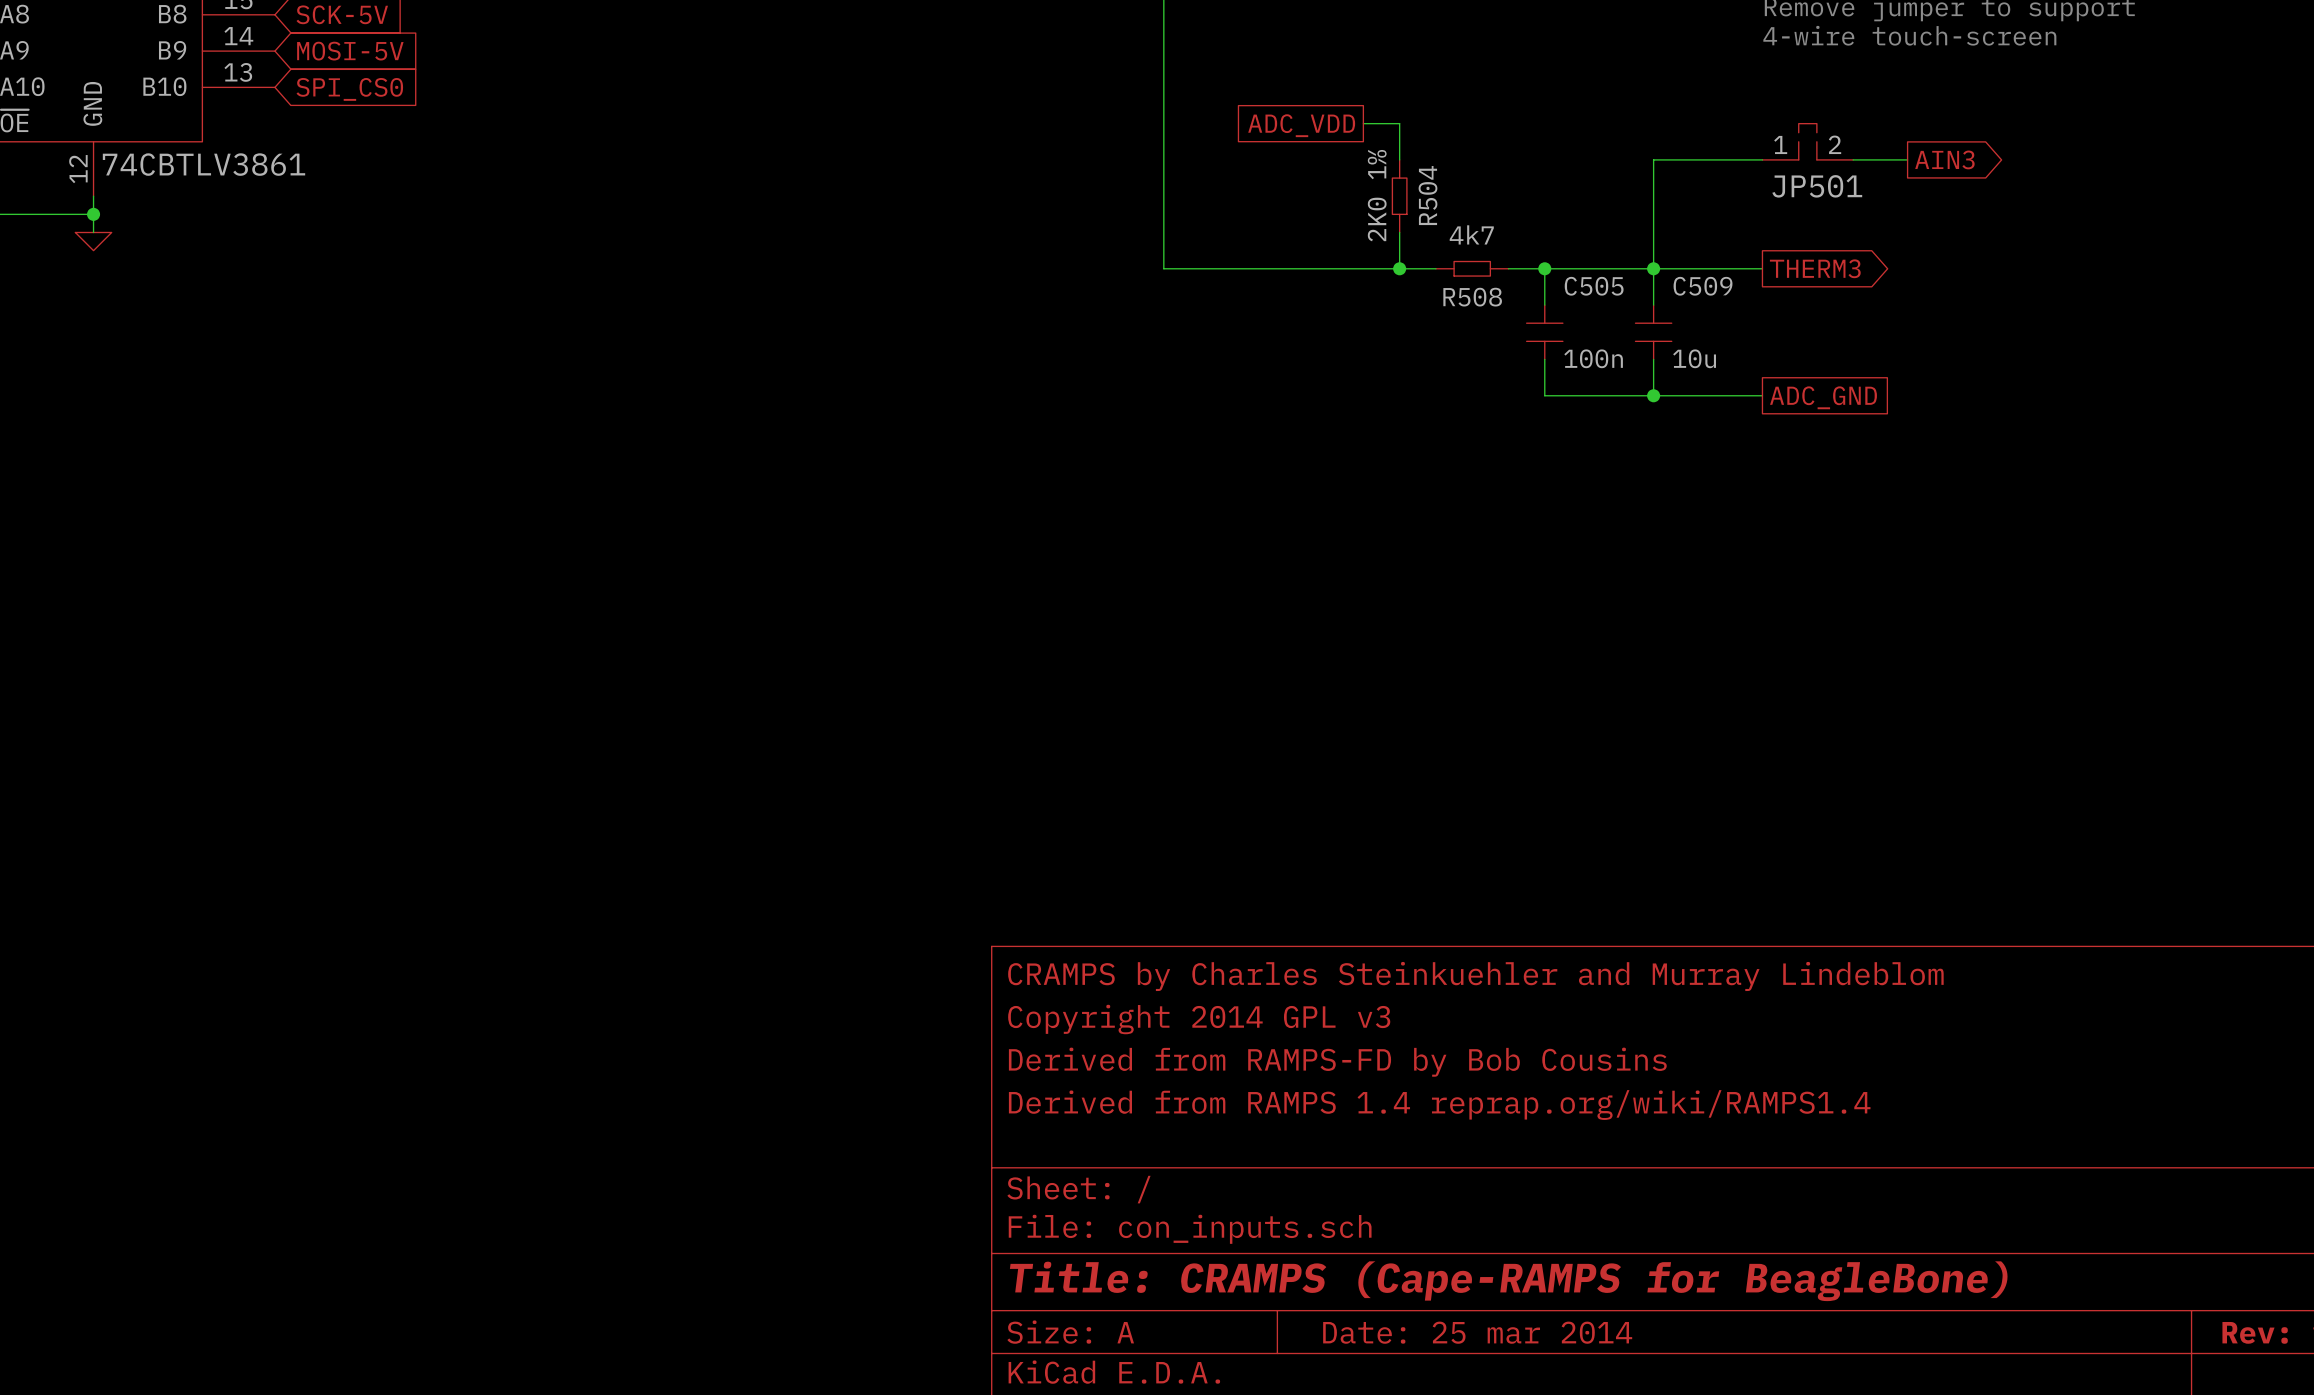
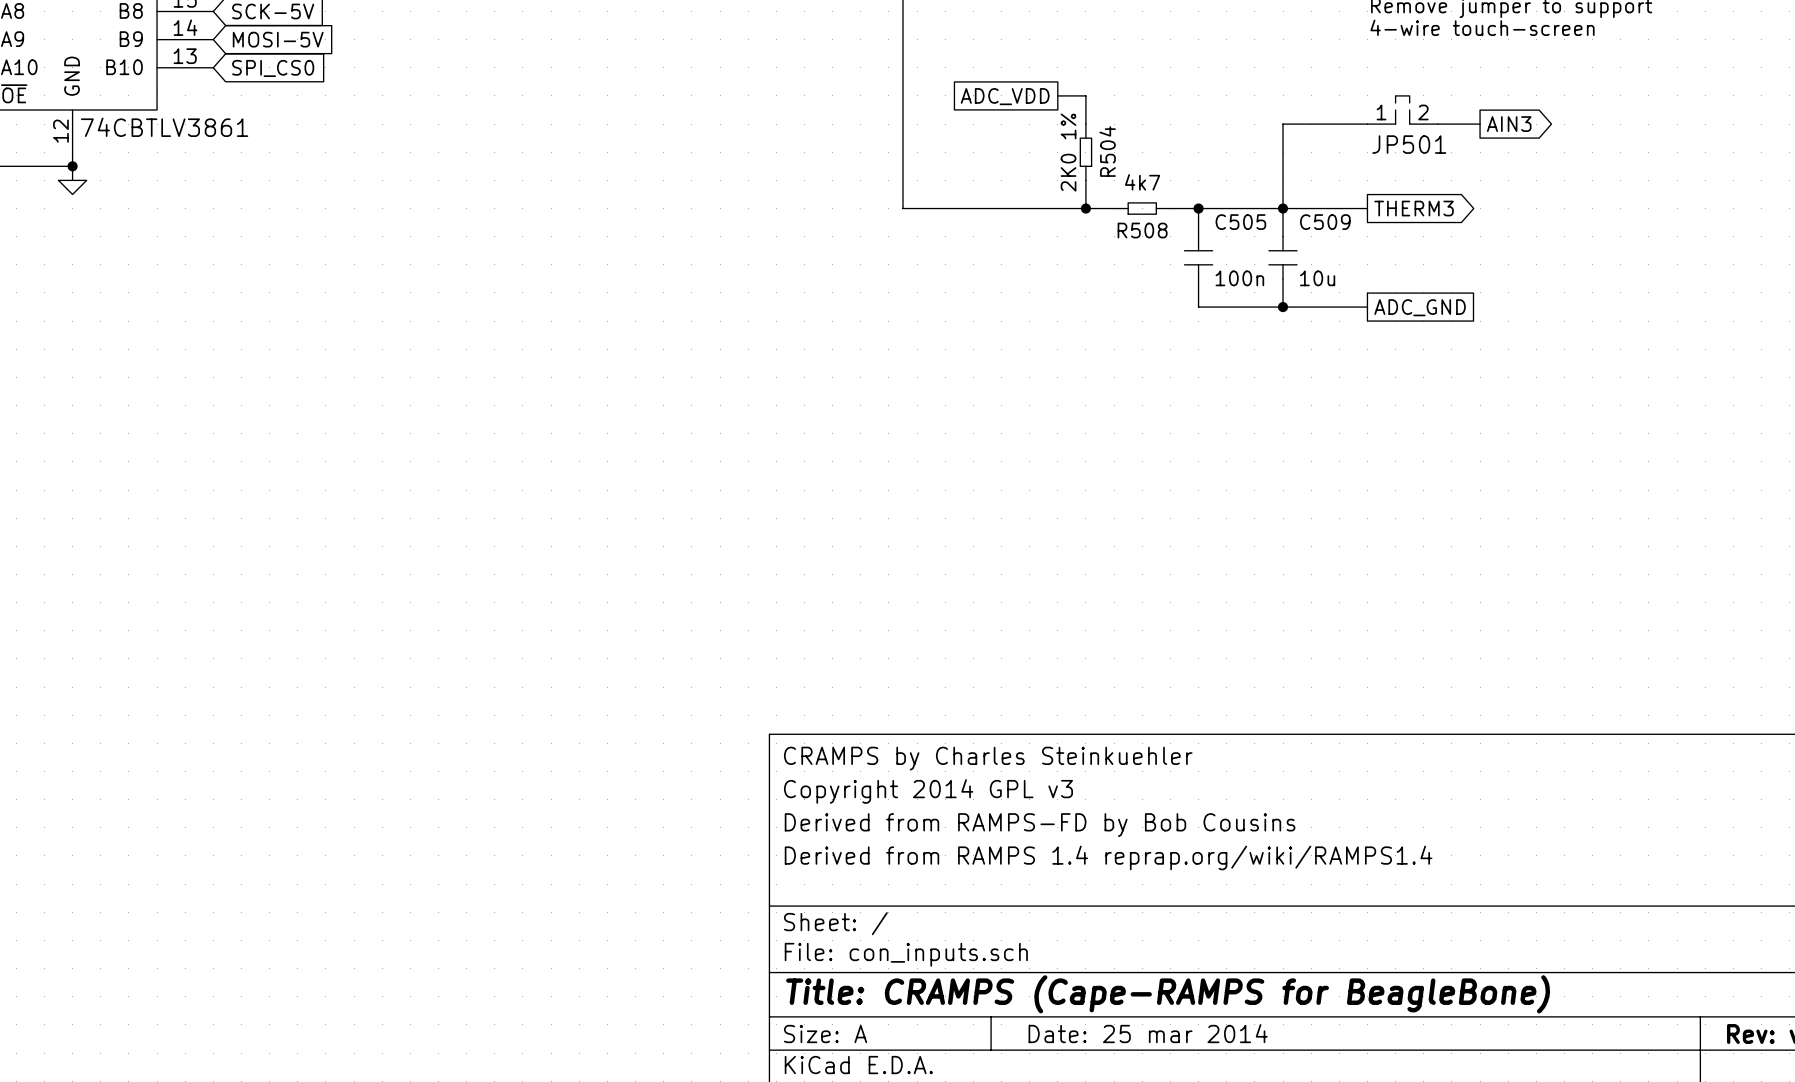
title block: CRAMPS by Charles Steinkuehler and Murray Lindeblom (1475, 976) -> CRAMPS by Charles Steinkuehler (988, 758)

